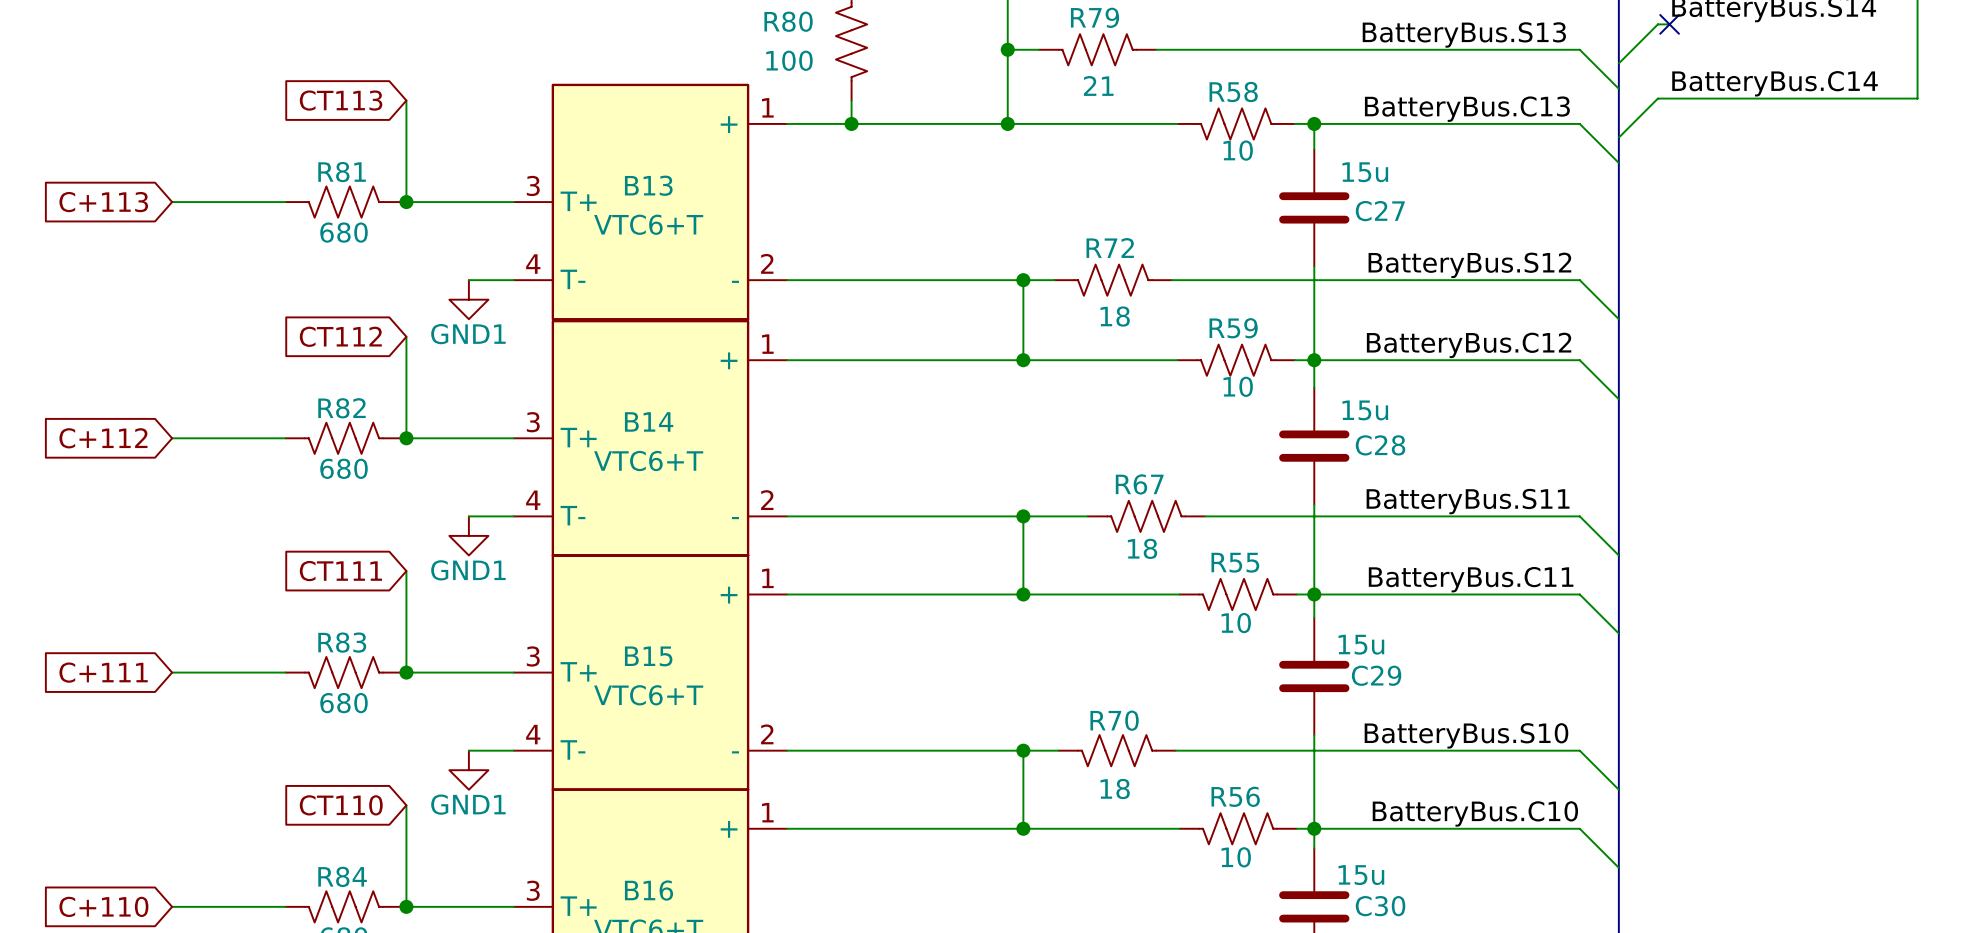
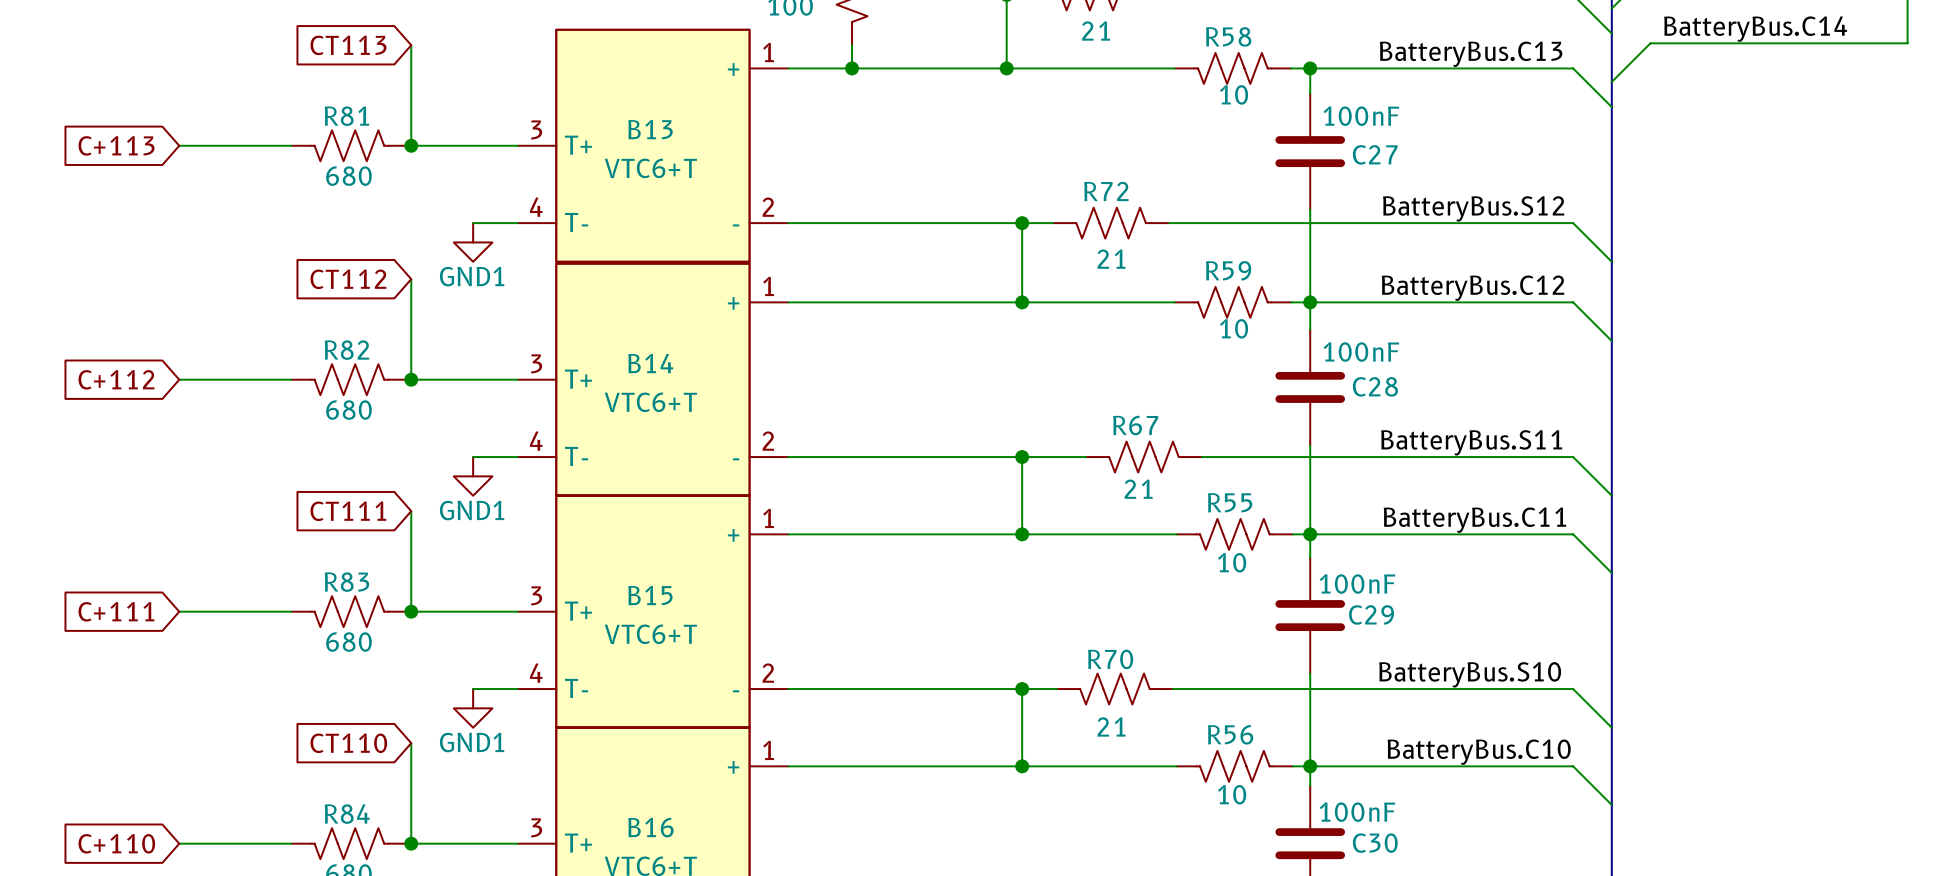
C27 value: 15u (1365, 172) -> 100nF (1361, 116)
R72 value: 18 (1115, 316) -> 21 (1111, 259)
C28 value: 15u (1365, 410) -> 100nF (1361, 352)
R67 value: 18 (1142, 548) -> 21 (1138, 489)
C29 value: 15u (1361, 644) -> 100nF (1357, 584)
R70 value: 18 (1115, 789) -> 21 (1111, 726)
C30 value: 15u (1361, 875) -> 100nF (1357, 812)

